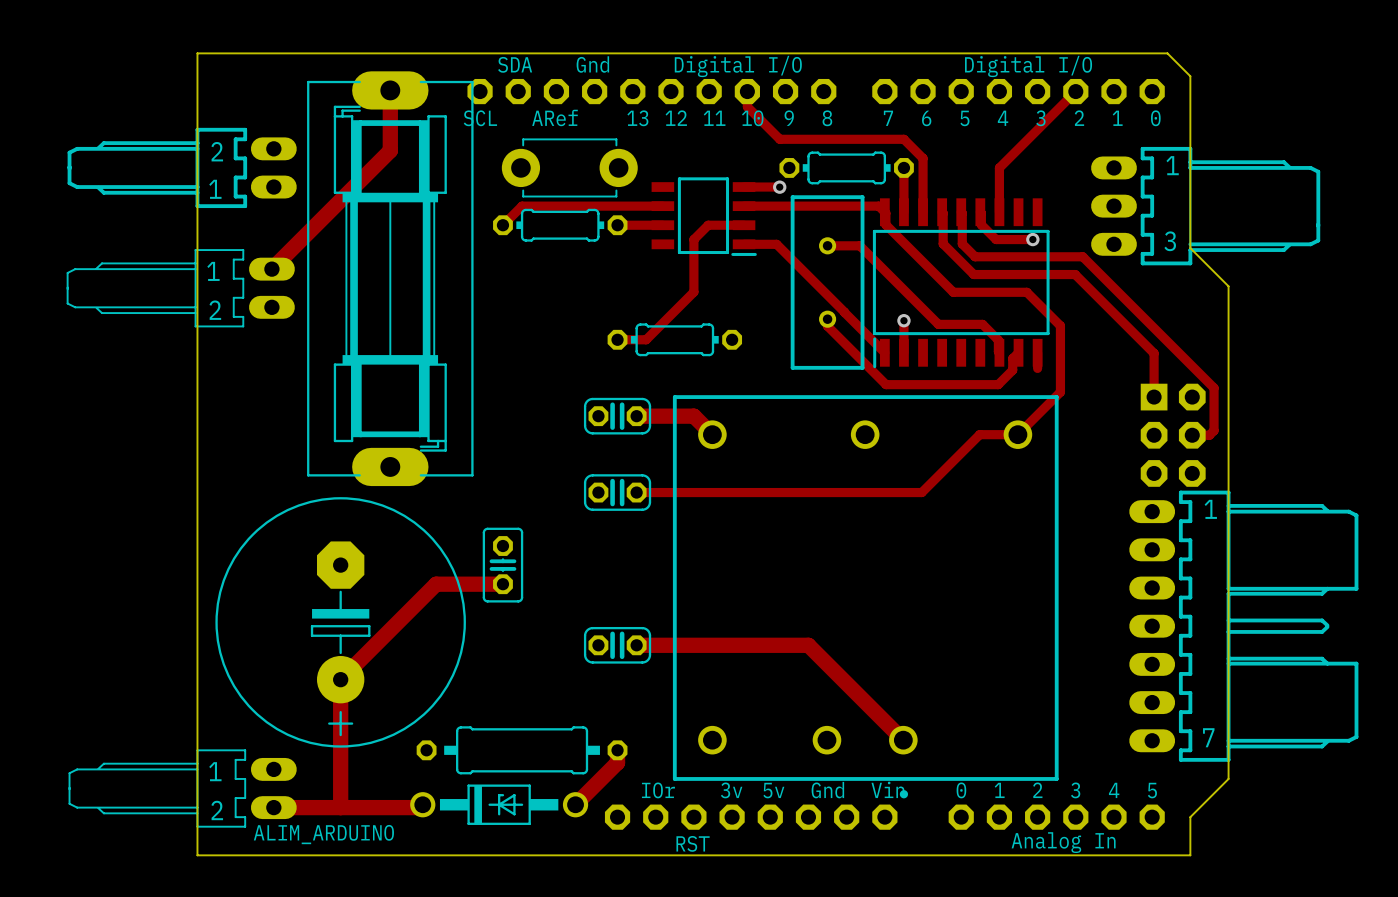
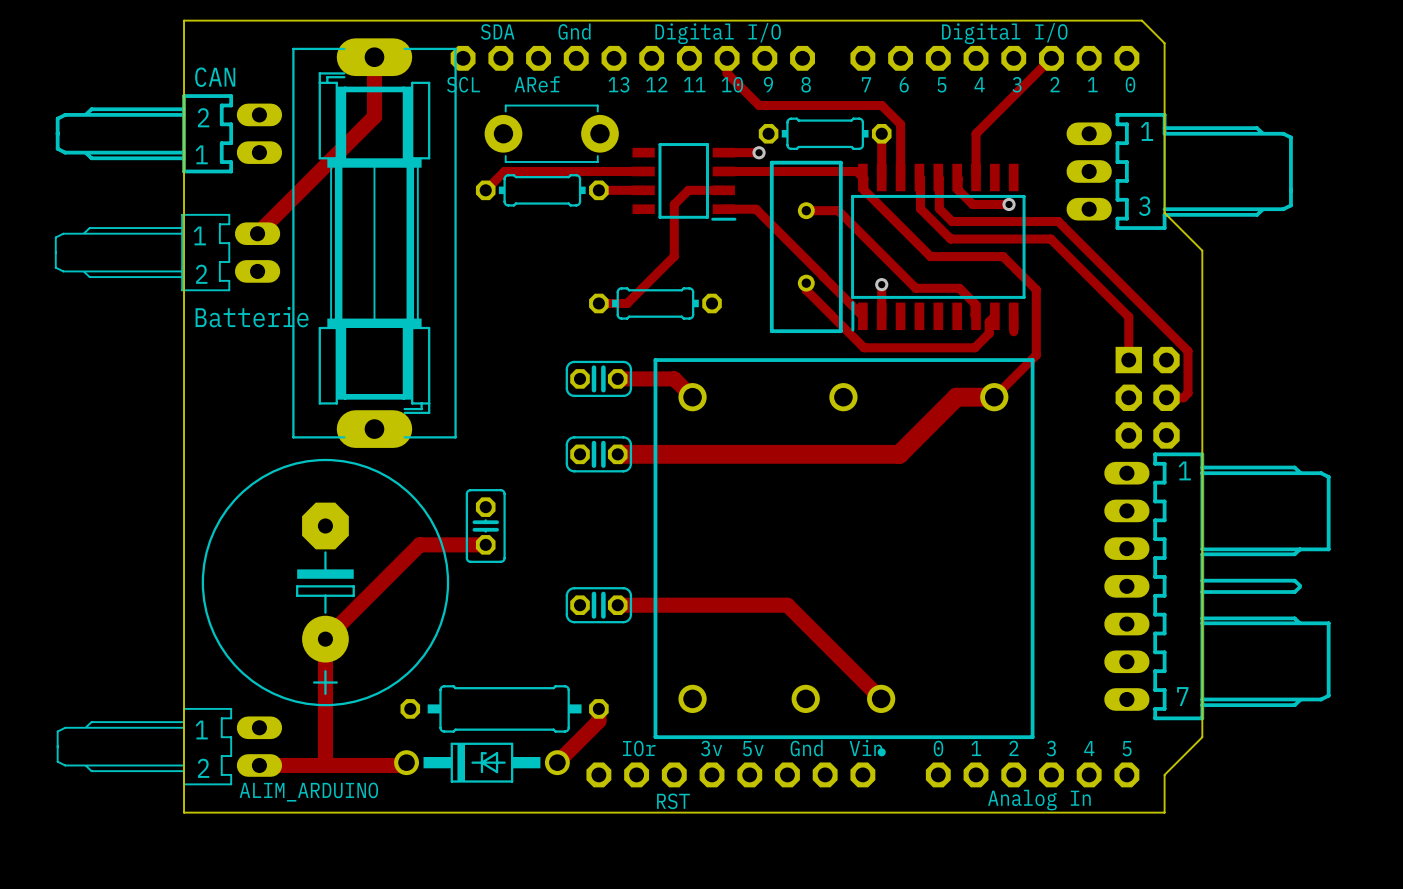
text: none -> CAN (215, 77)
text: none -> Batterie (252, 317)
track width: thin (1017, 434) (979, 434) (921, 492) (636, 492) -> thick (994, 397) (956, 397) (899, 454) (617, 454)

